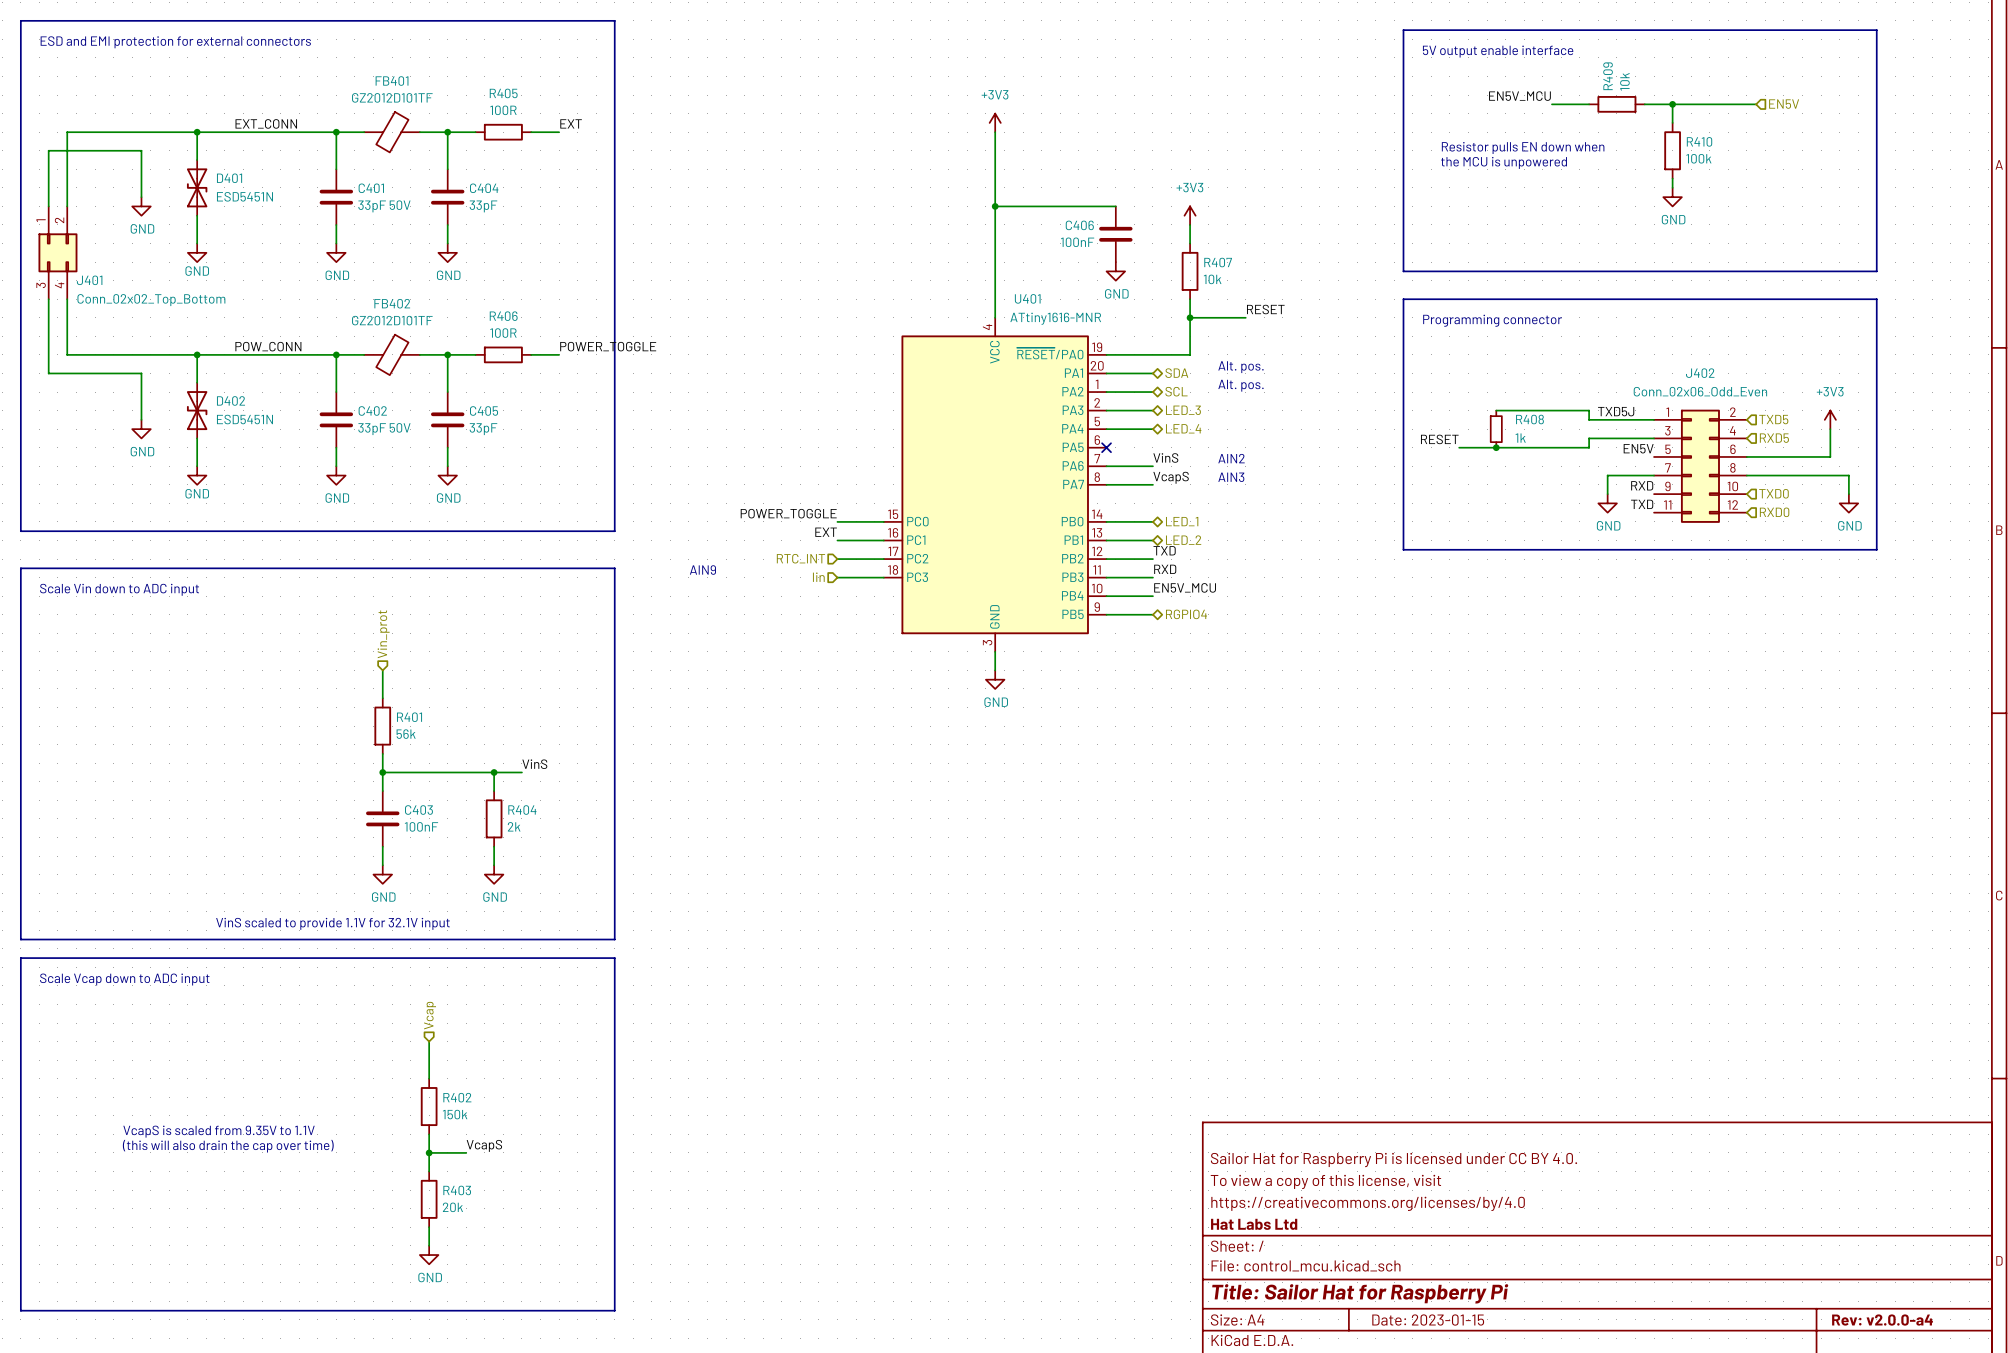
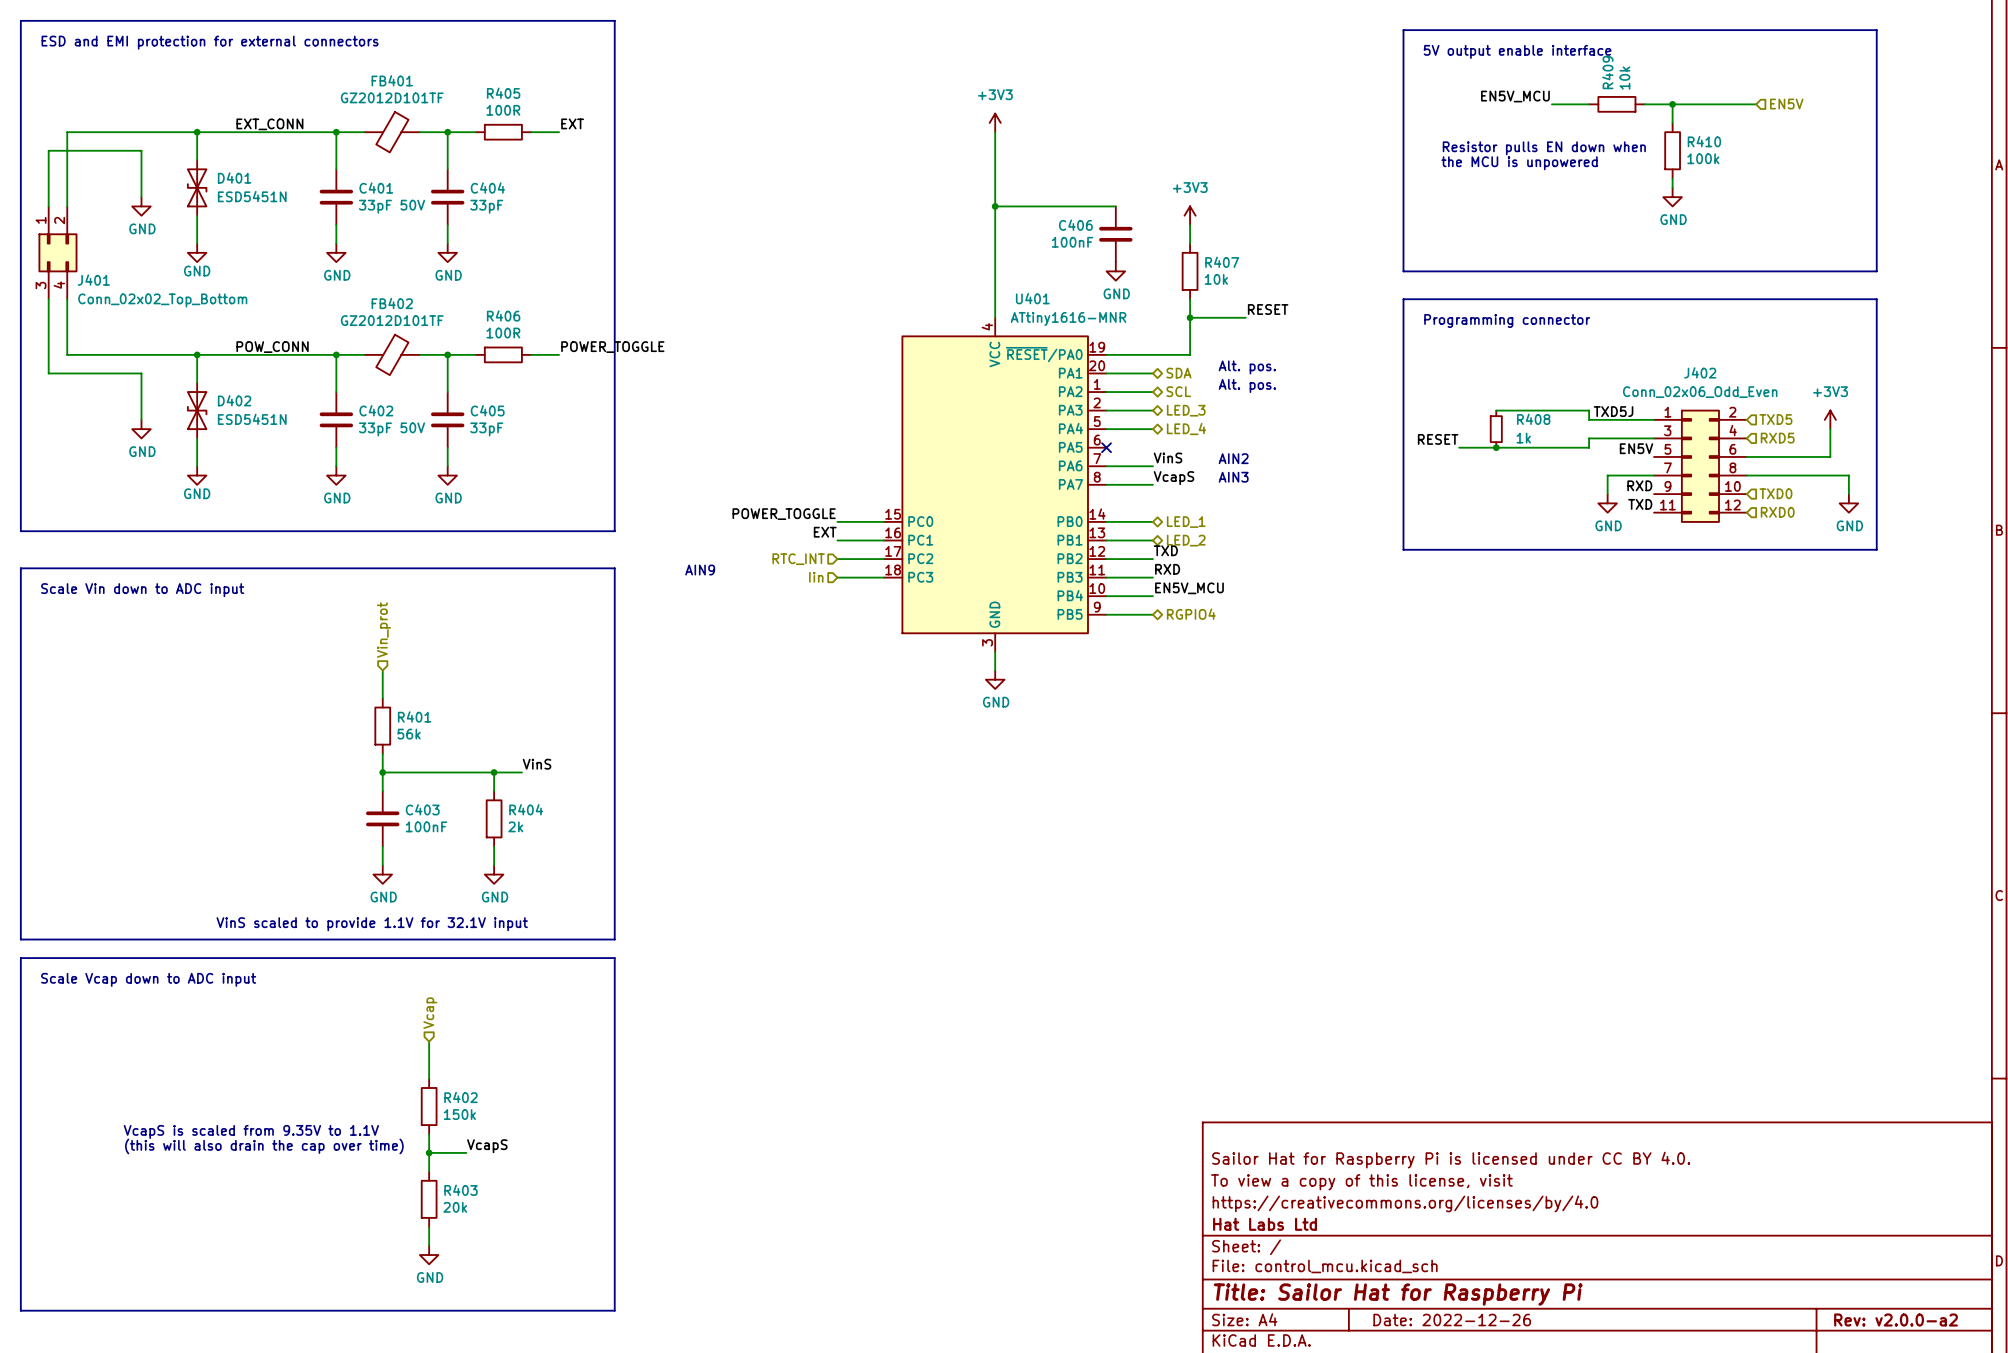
title block: Date: 2023-01-15 (1428, 1320) -> Date: 2022-12-26 (1452, 1320)
title block: Rev: v2.0.0-a4 (1882, 1320) -> Rev: v2.0.0-a2 (1896, 1320)

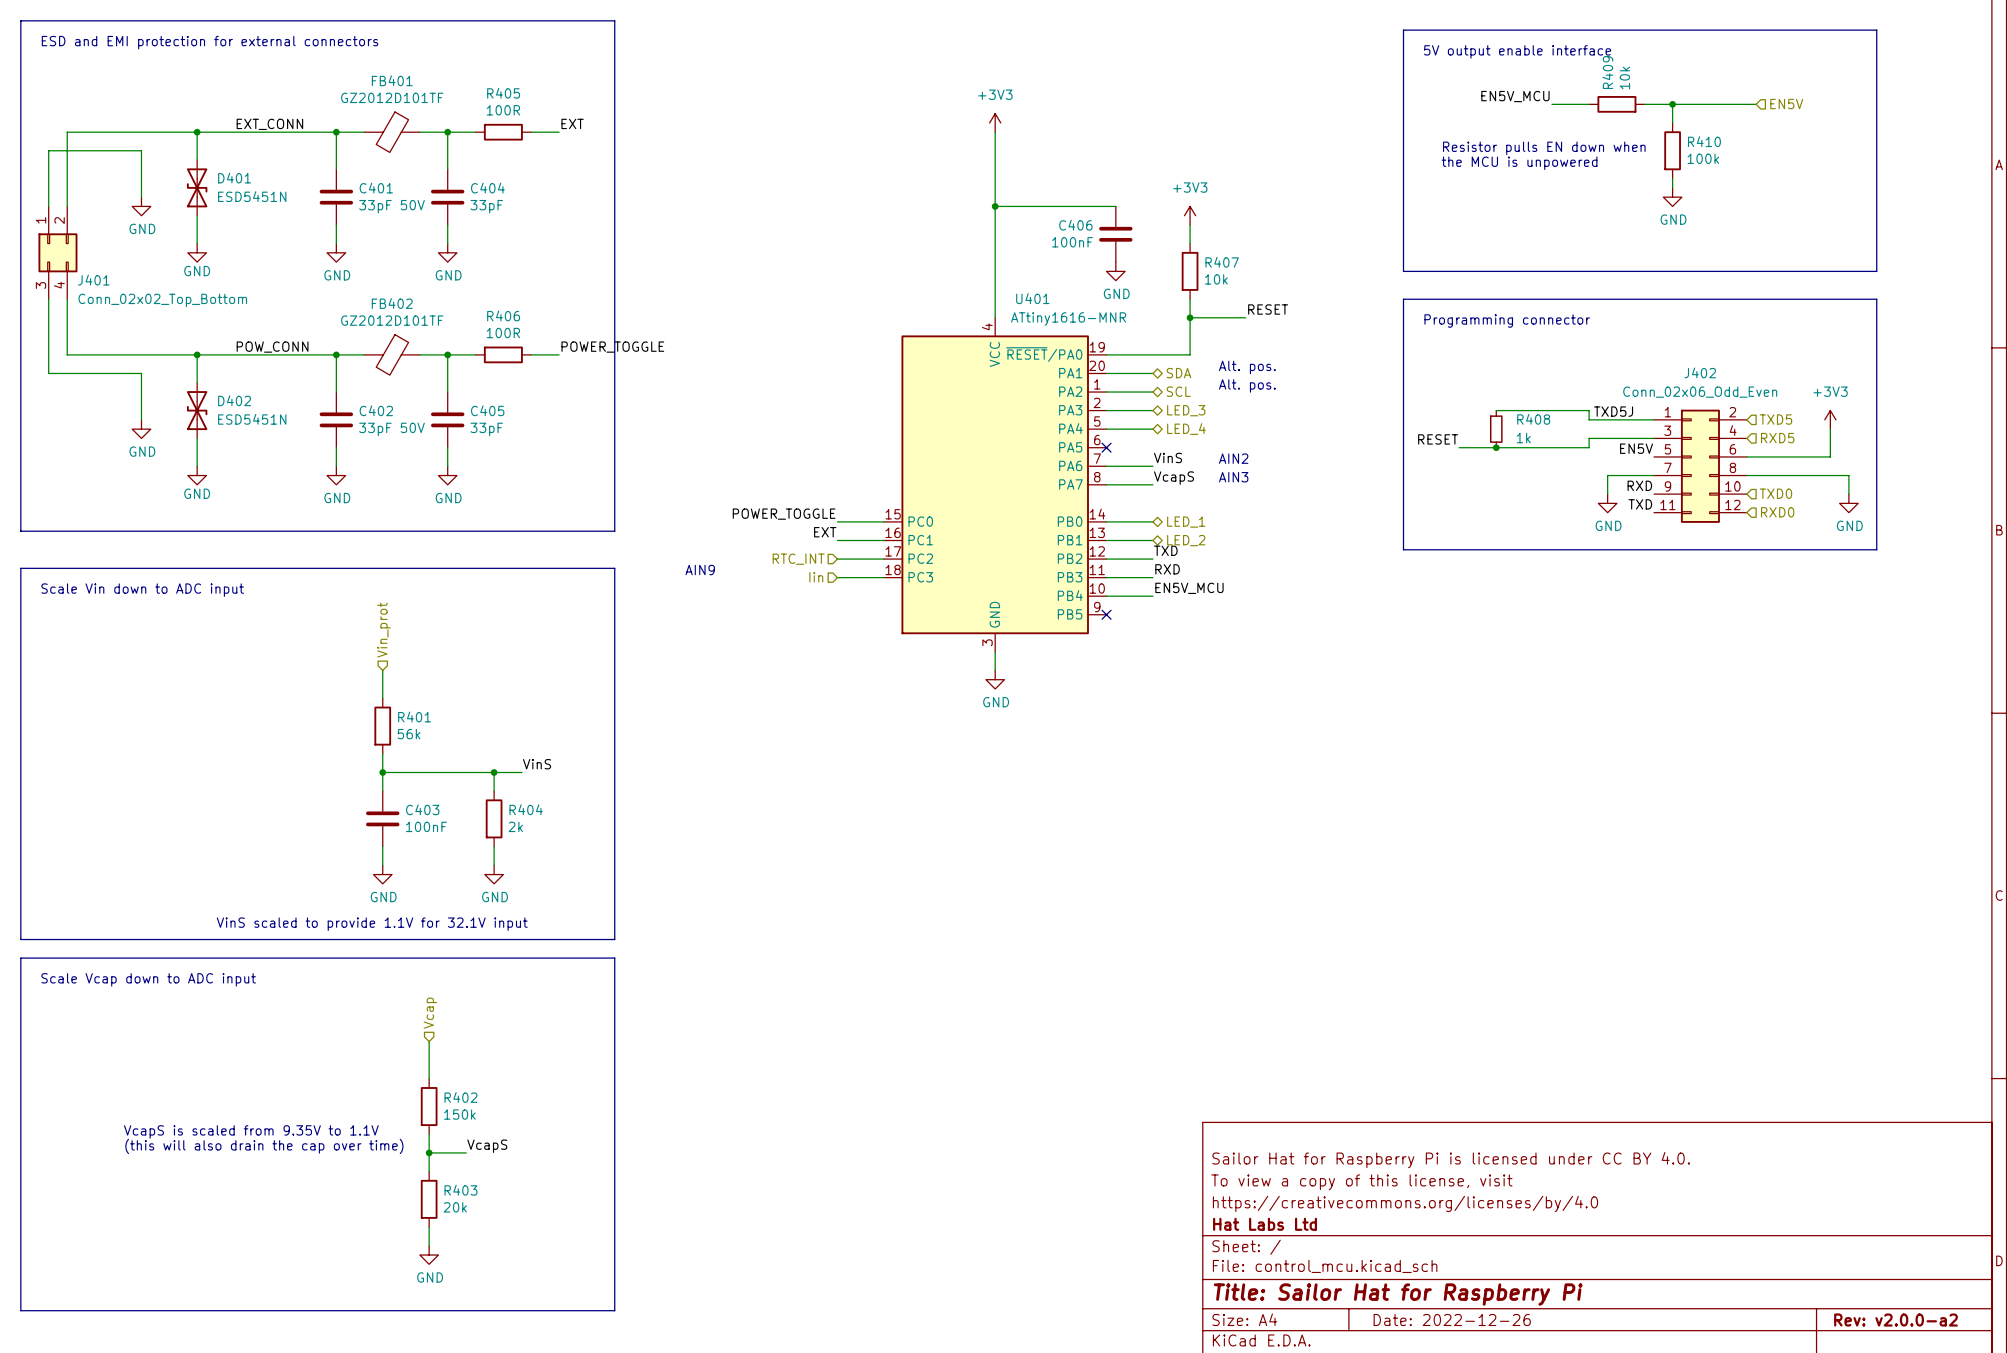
wire: (1106, 614) (1152, 614) -> none
no-connect mark: none -> (1106, 614)
hierarchical label: RGPIO4 (1191, 614) -> none

